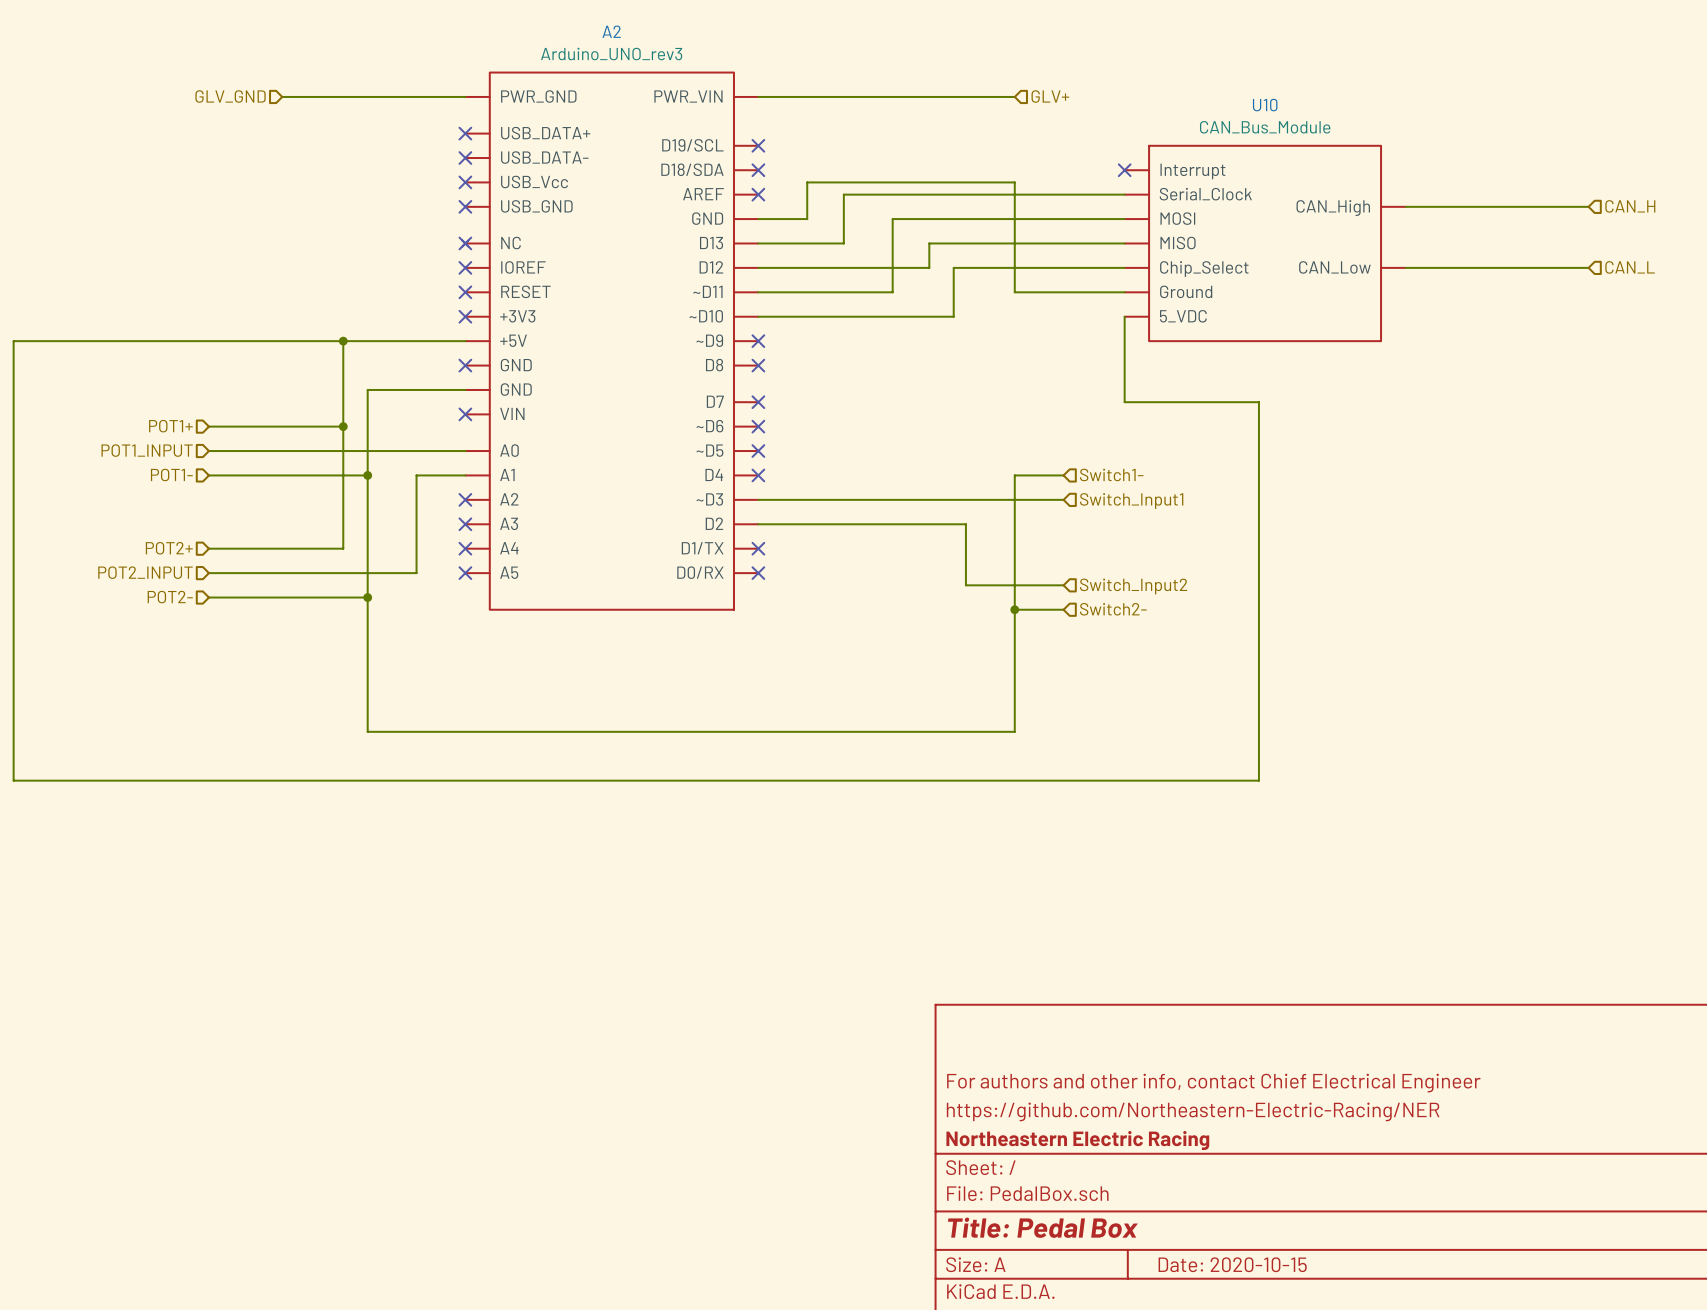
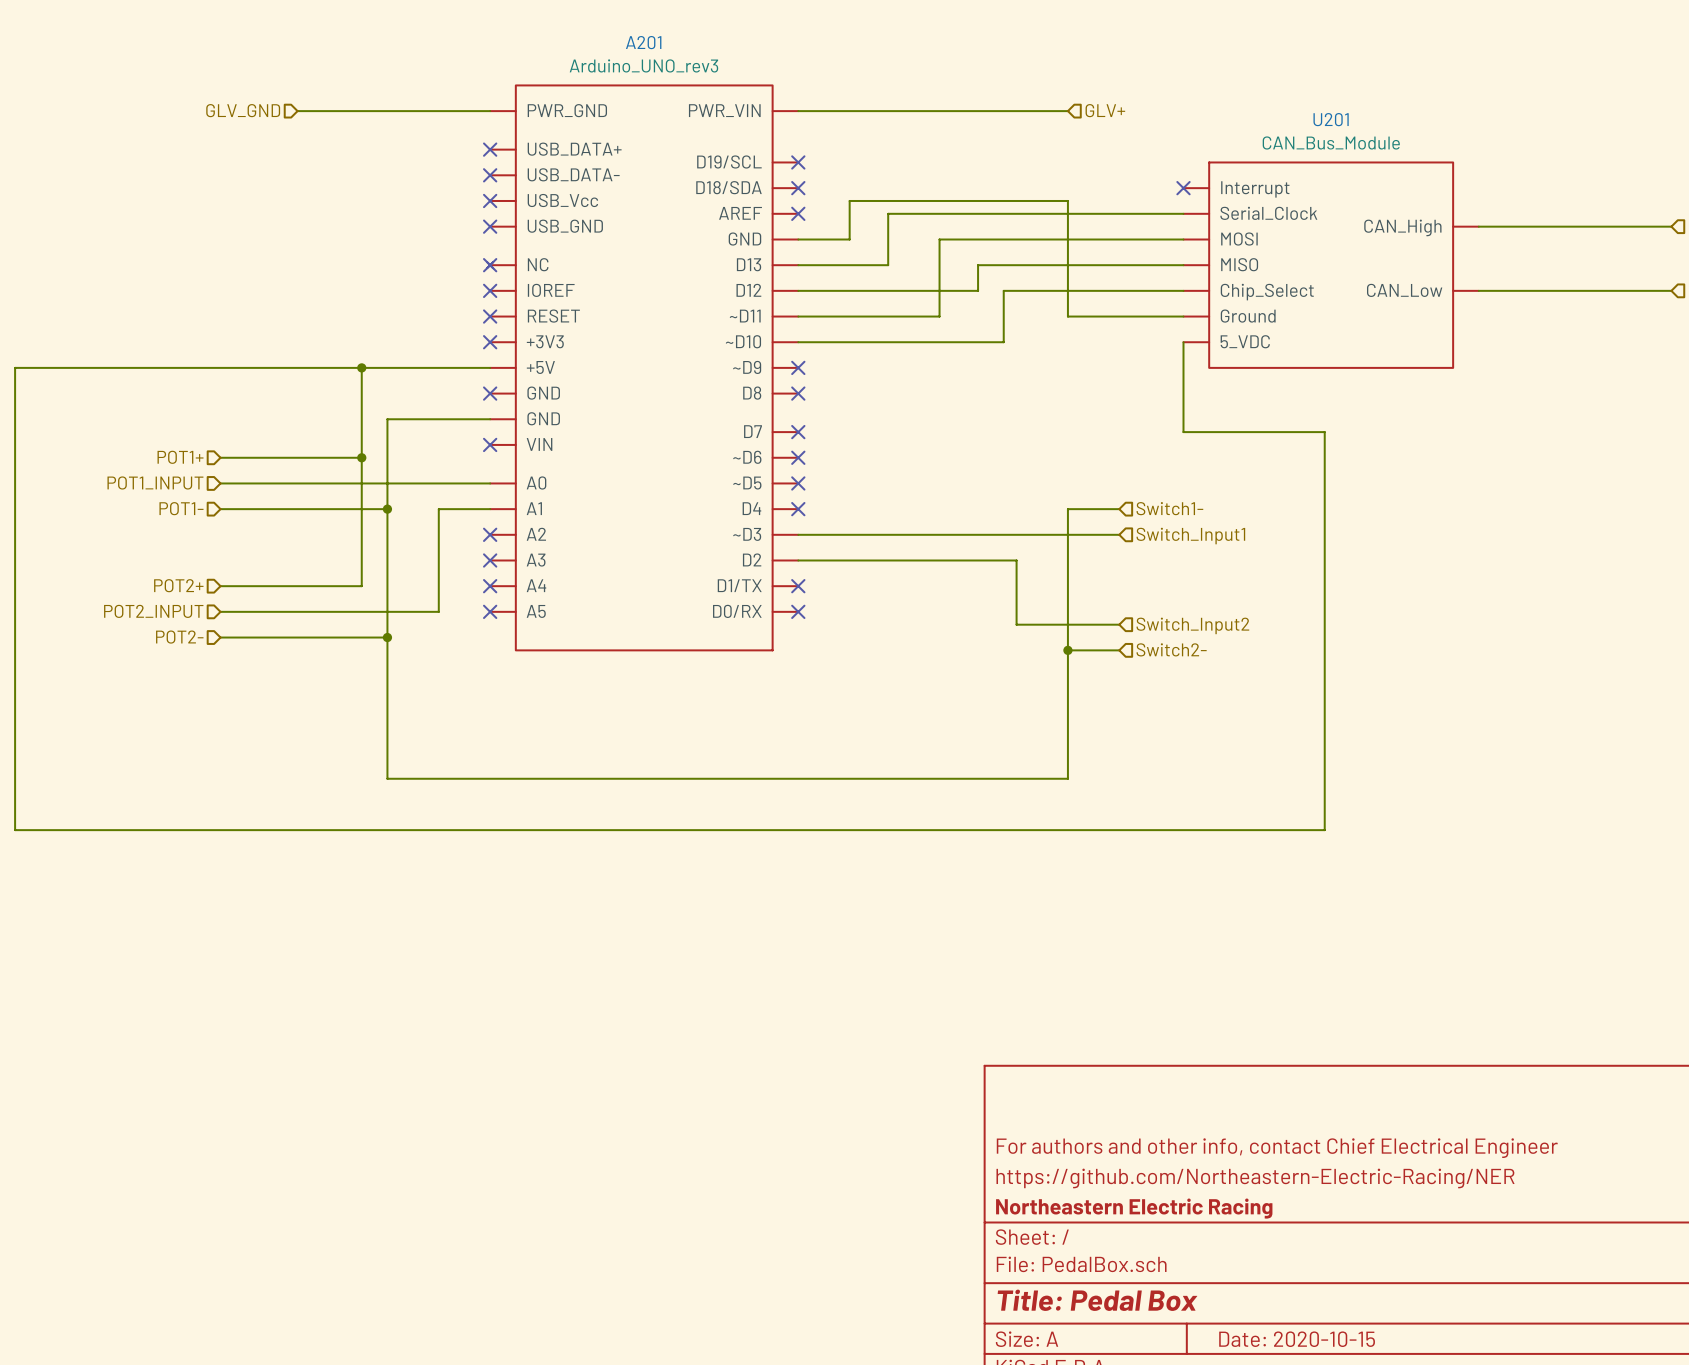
A2 name: A2 (611, 31) -> A201 (643, 42)
U10 name: U10 (1265, 105) -> U201 (1331, 119)

